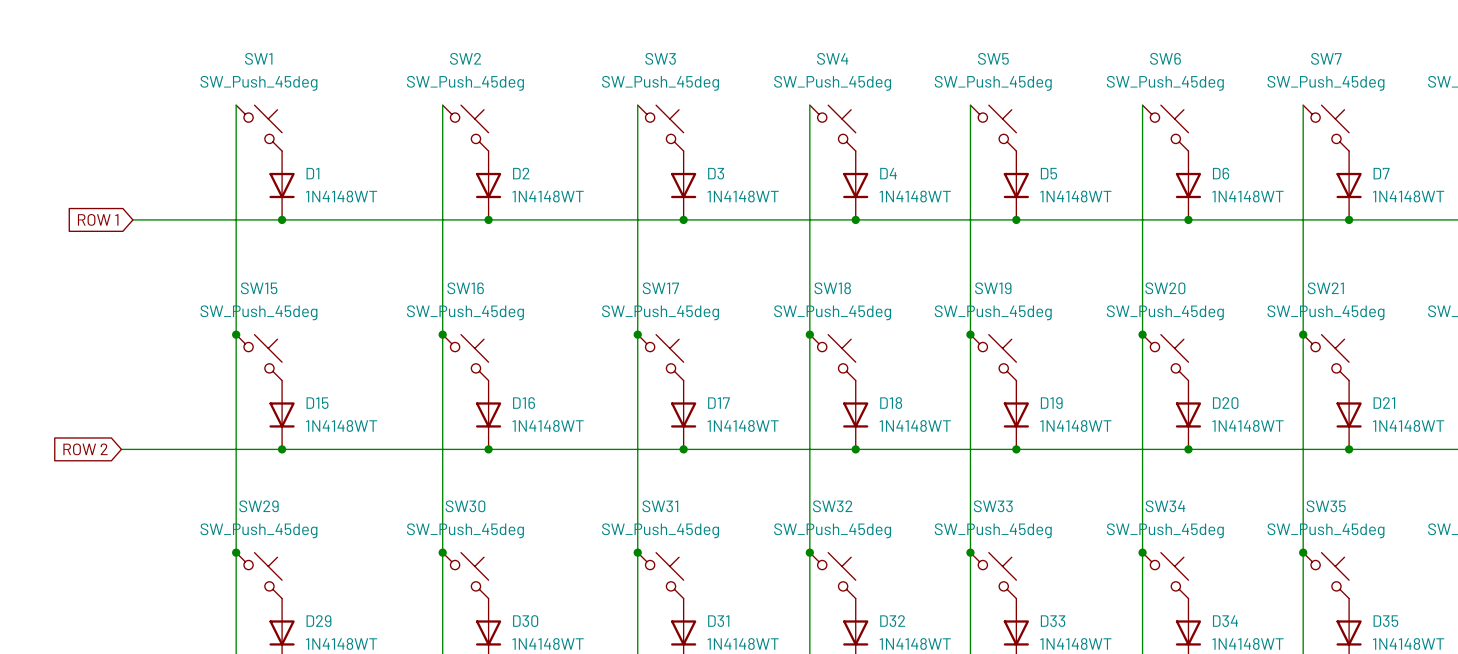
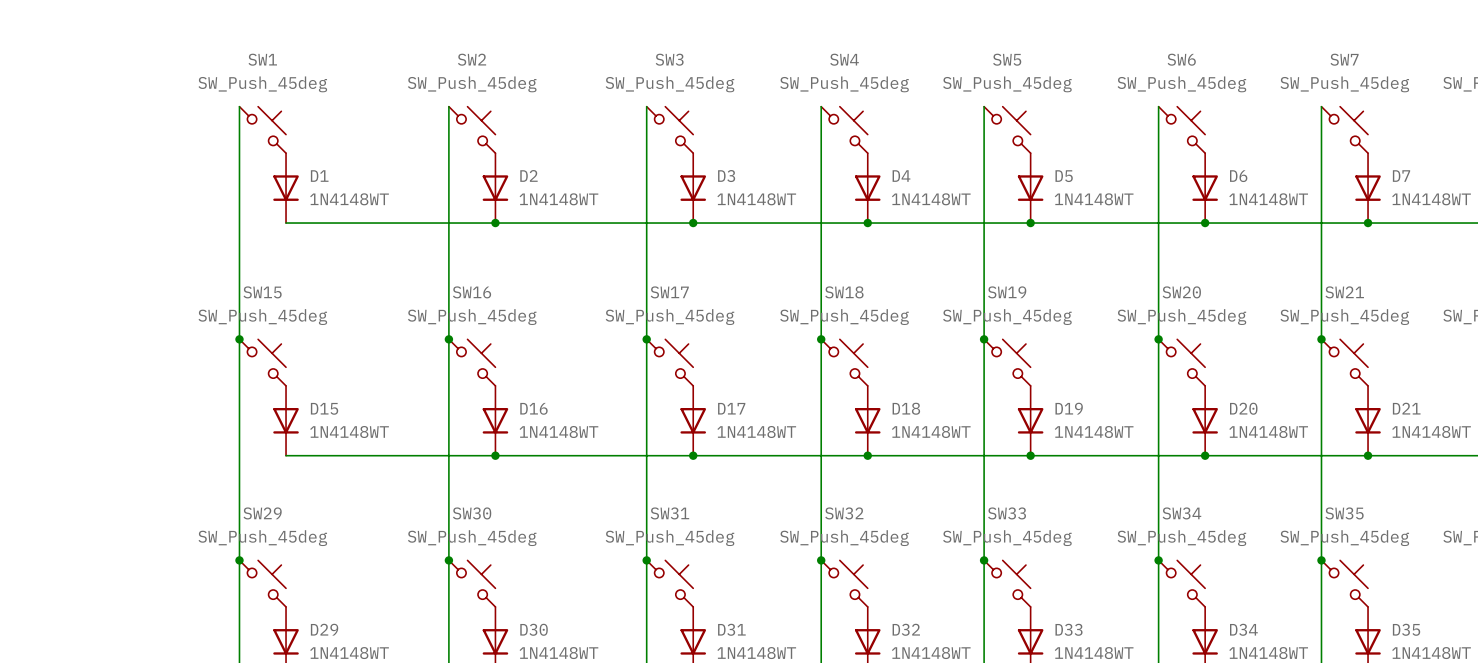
global label: ROW 1 (98, 219) -> none
wire: (132, 219) (282, 219) -> none
junction: (282, 219) -> none
global label: ROW 2 (85, 449) -> none
wire: (121, 449) (282, 449) -> none
junction: (282, 449) -> none

